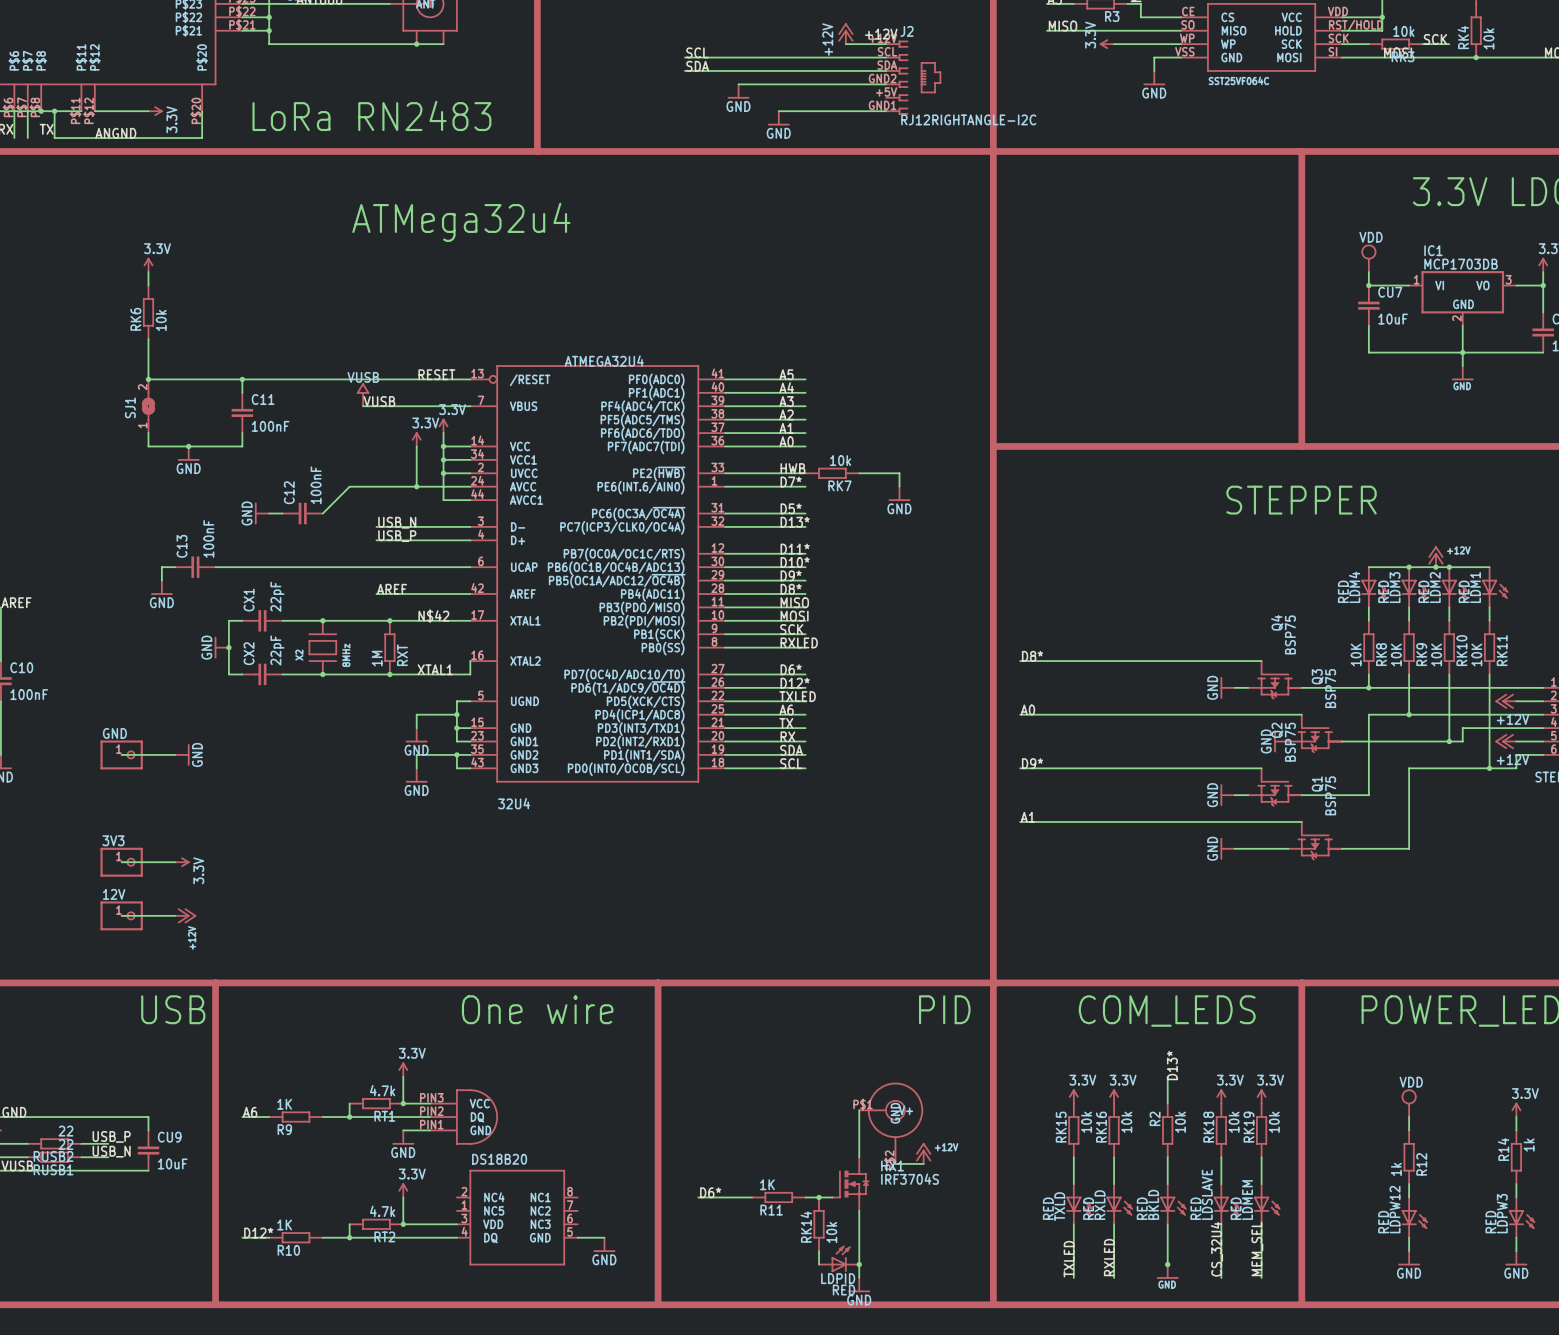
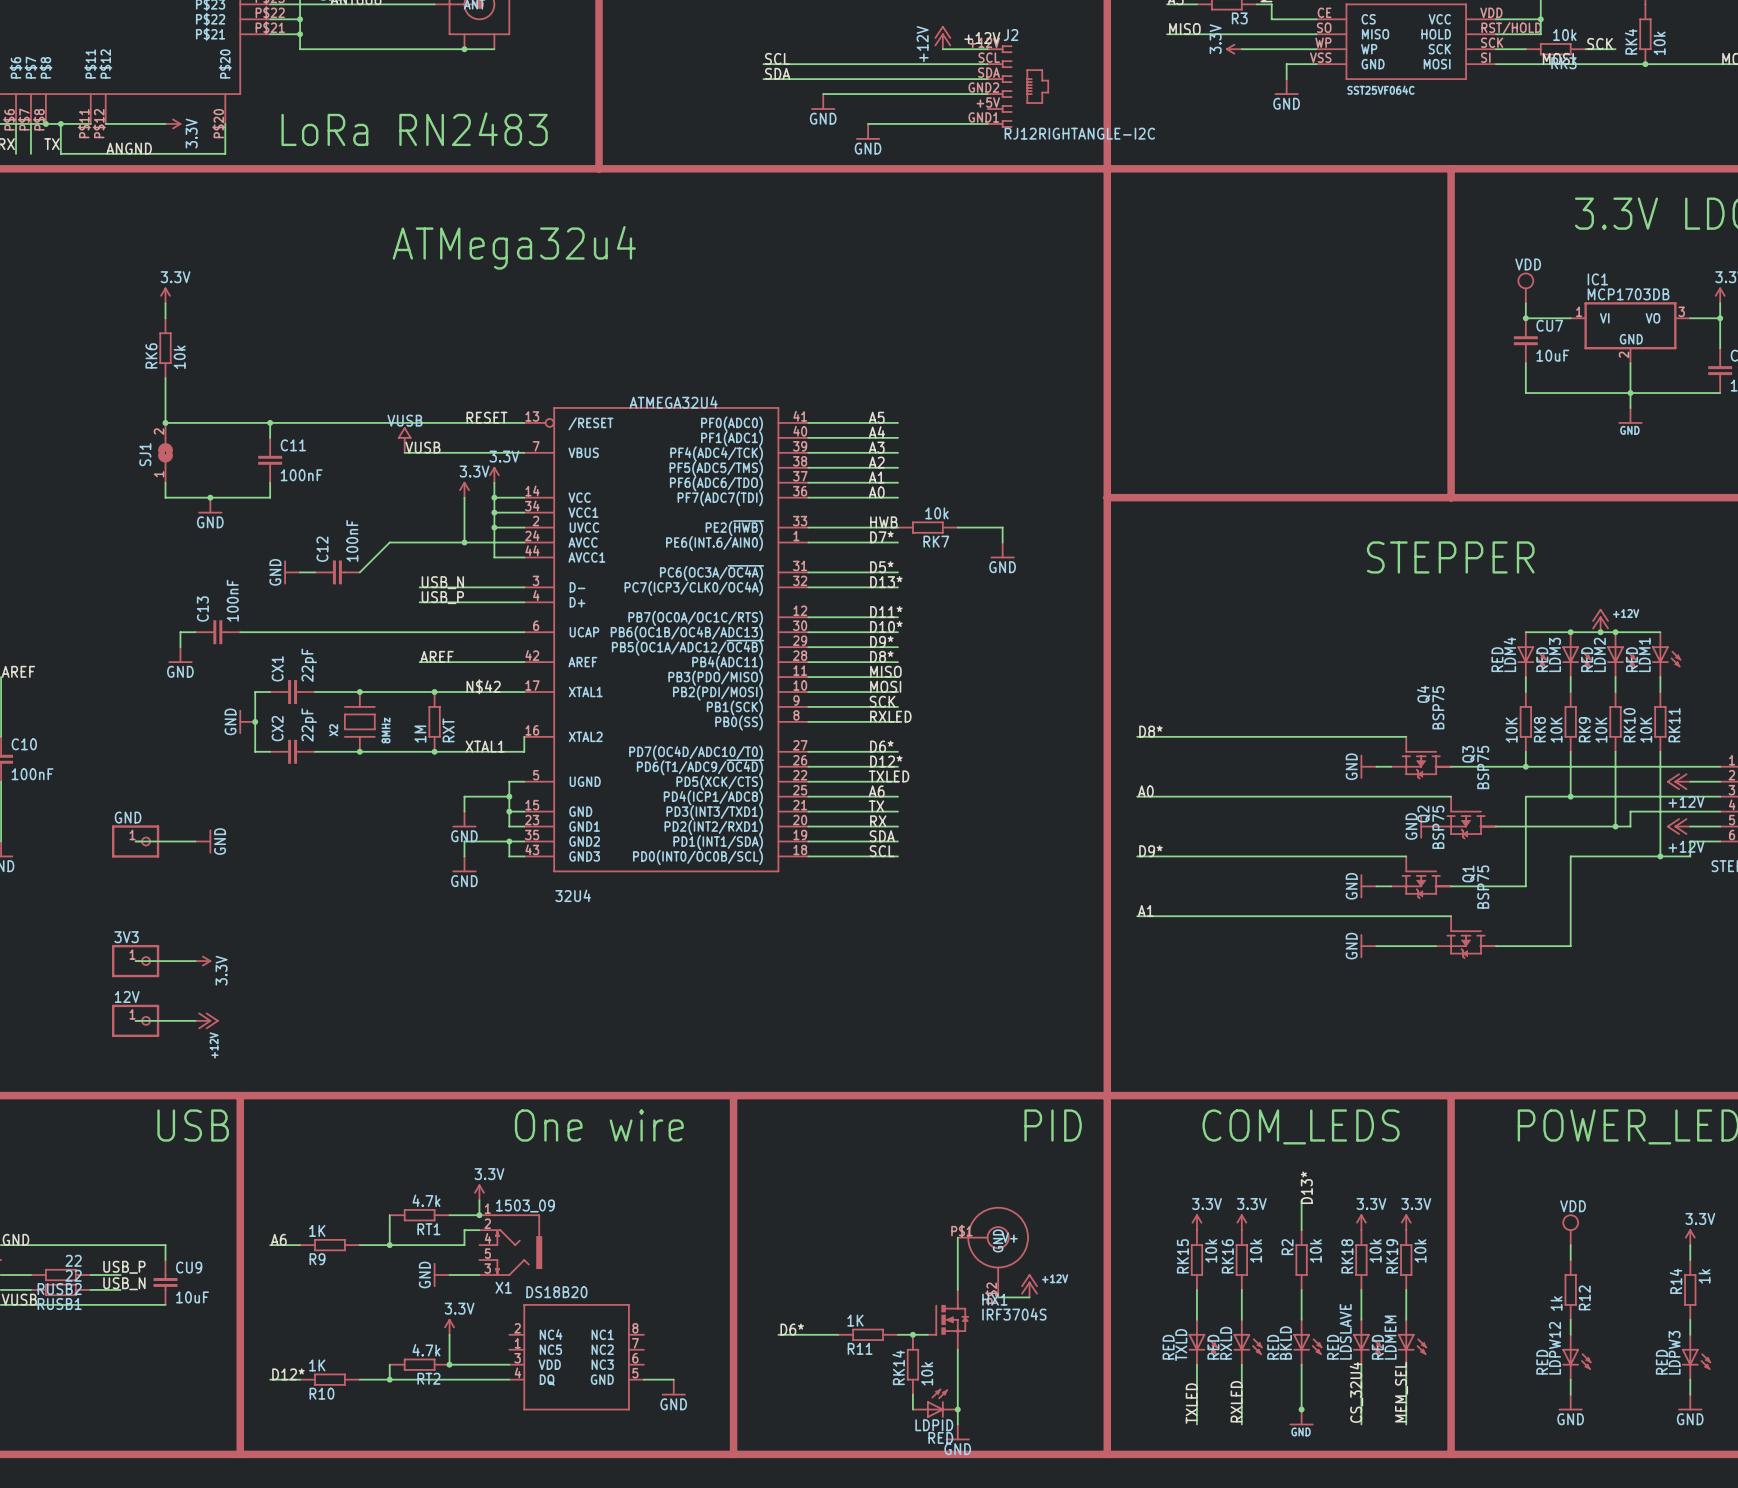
power symbol position: 3.3V (403, 1069) -> 3.3V (479, 1192)
wire: (403, 1076) (403, 1103) (416, 1103) -> none
wire: none -> (479, 1200) (479, 1215) (449, 1215)
wire: none -> (389, 1215) (389, 1230)
RT1 position: (376, 1103) -> (419, 1215)
junction position: (403, 1103) -> (479, 1215)
wire: (416, 1117) (430, 1117) -> (464, 1245) (464, 1230)
X1: none -> 1503_09 (510, 1245)
part: (463, 1117) -> none
wire: (403, 1130) (430, 1130) -> (449, 1275) (479, 1275)
power symbol rotation: 0° (403, 1143) -> 90° clockwise (434, 1275)

